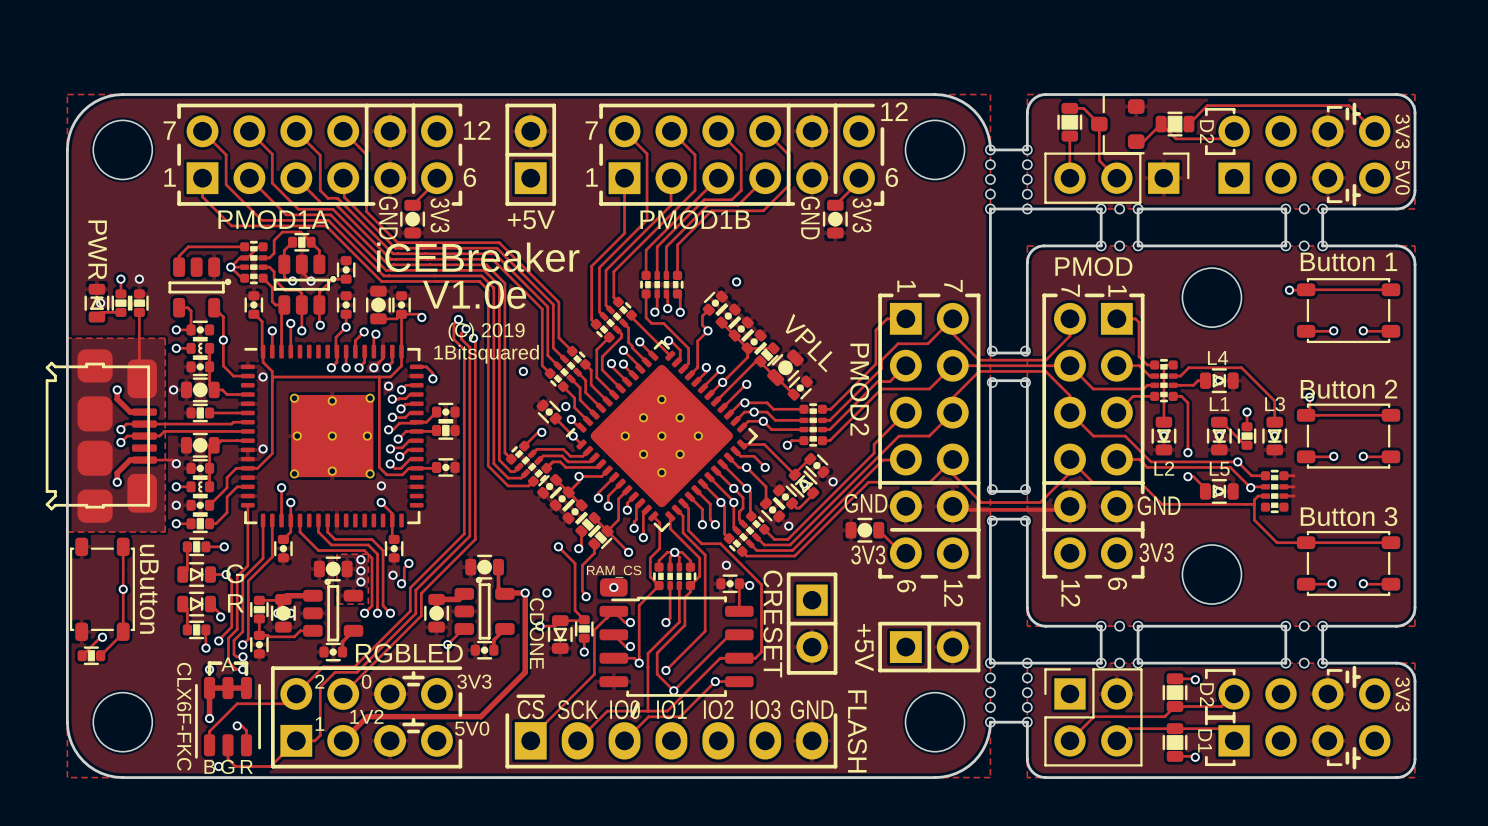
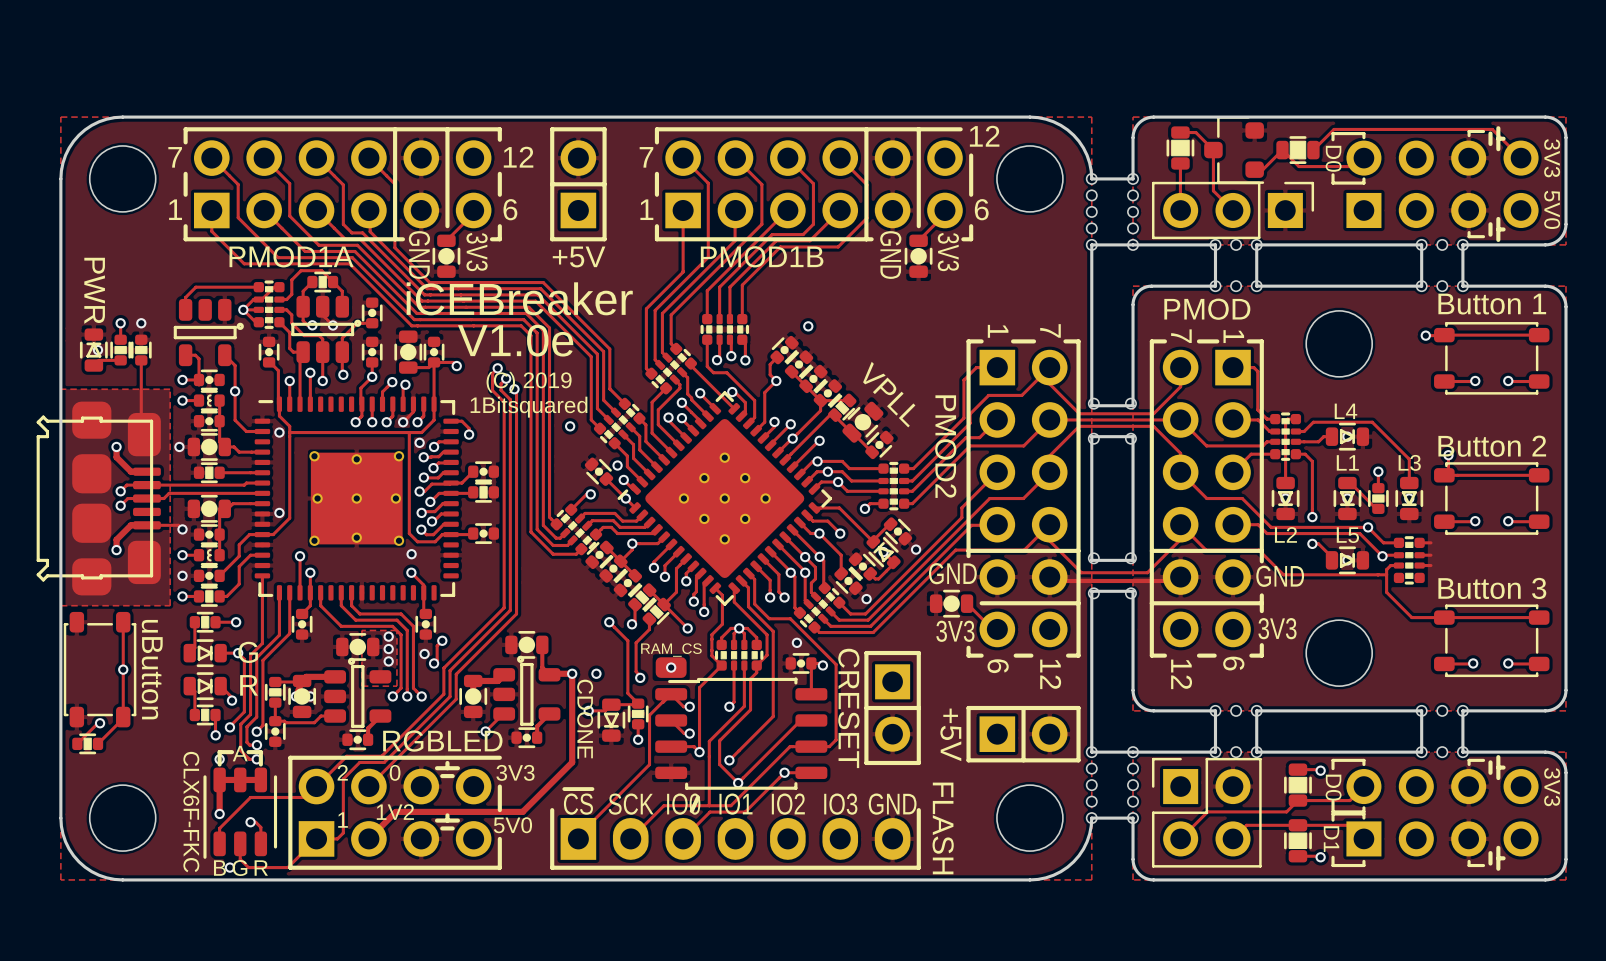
text: D2 (1207, 131) -> D0 (1333, 158)
text: D2 (1207, 694) -> D0 (1333, 787)

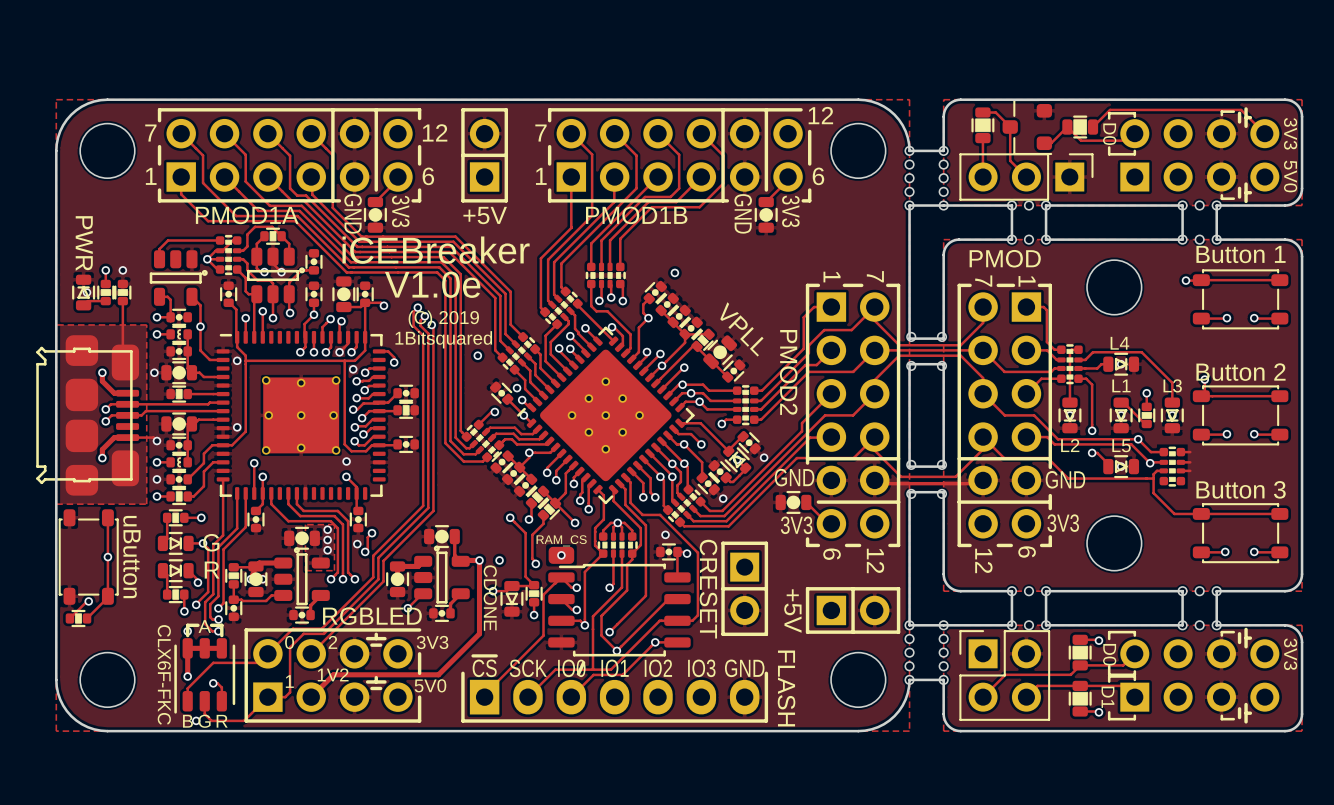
text: 2 (342, 772) -> 0 (289, 642)
text: 0 (395, 772) -> 2 (332, 642)

